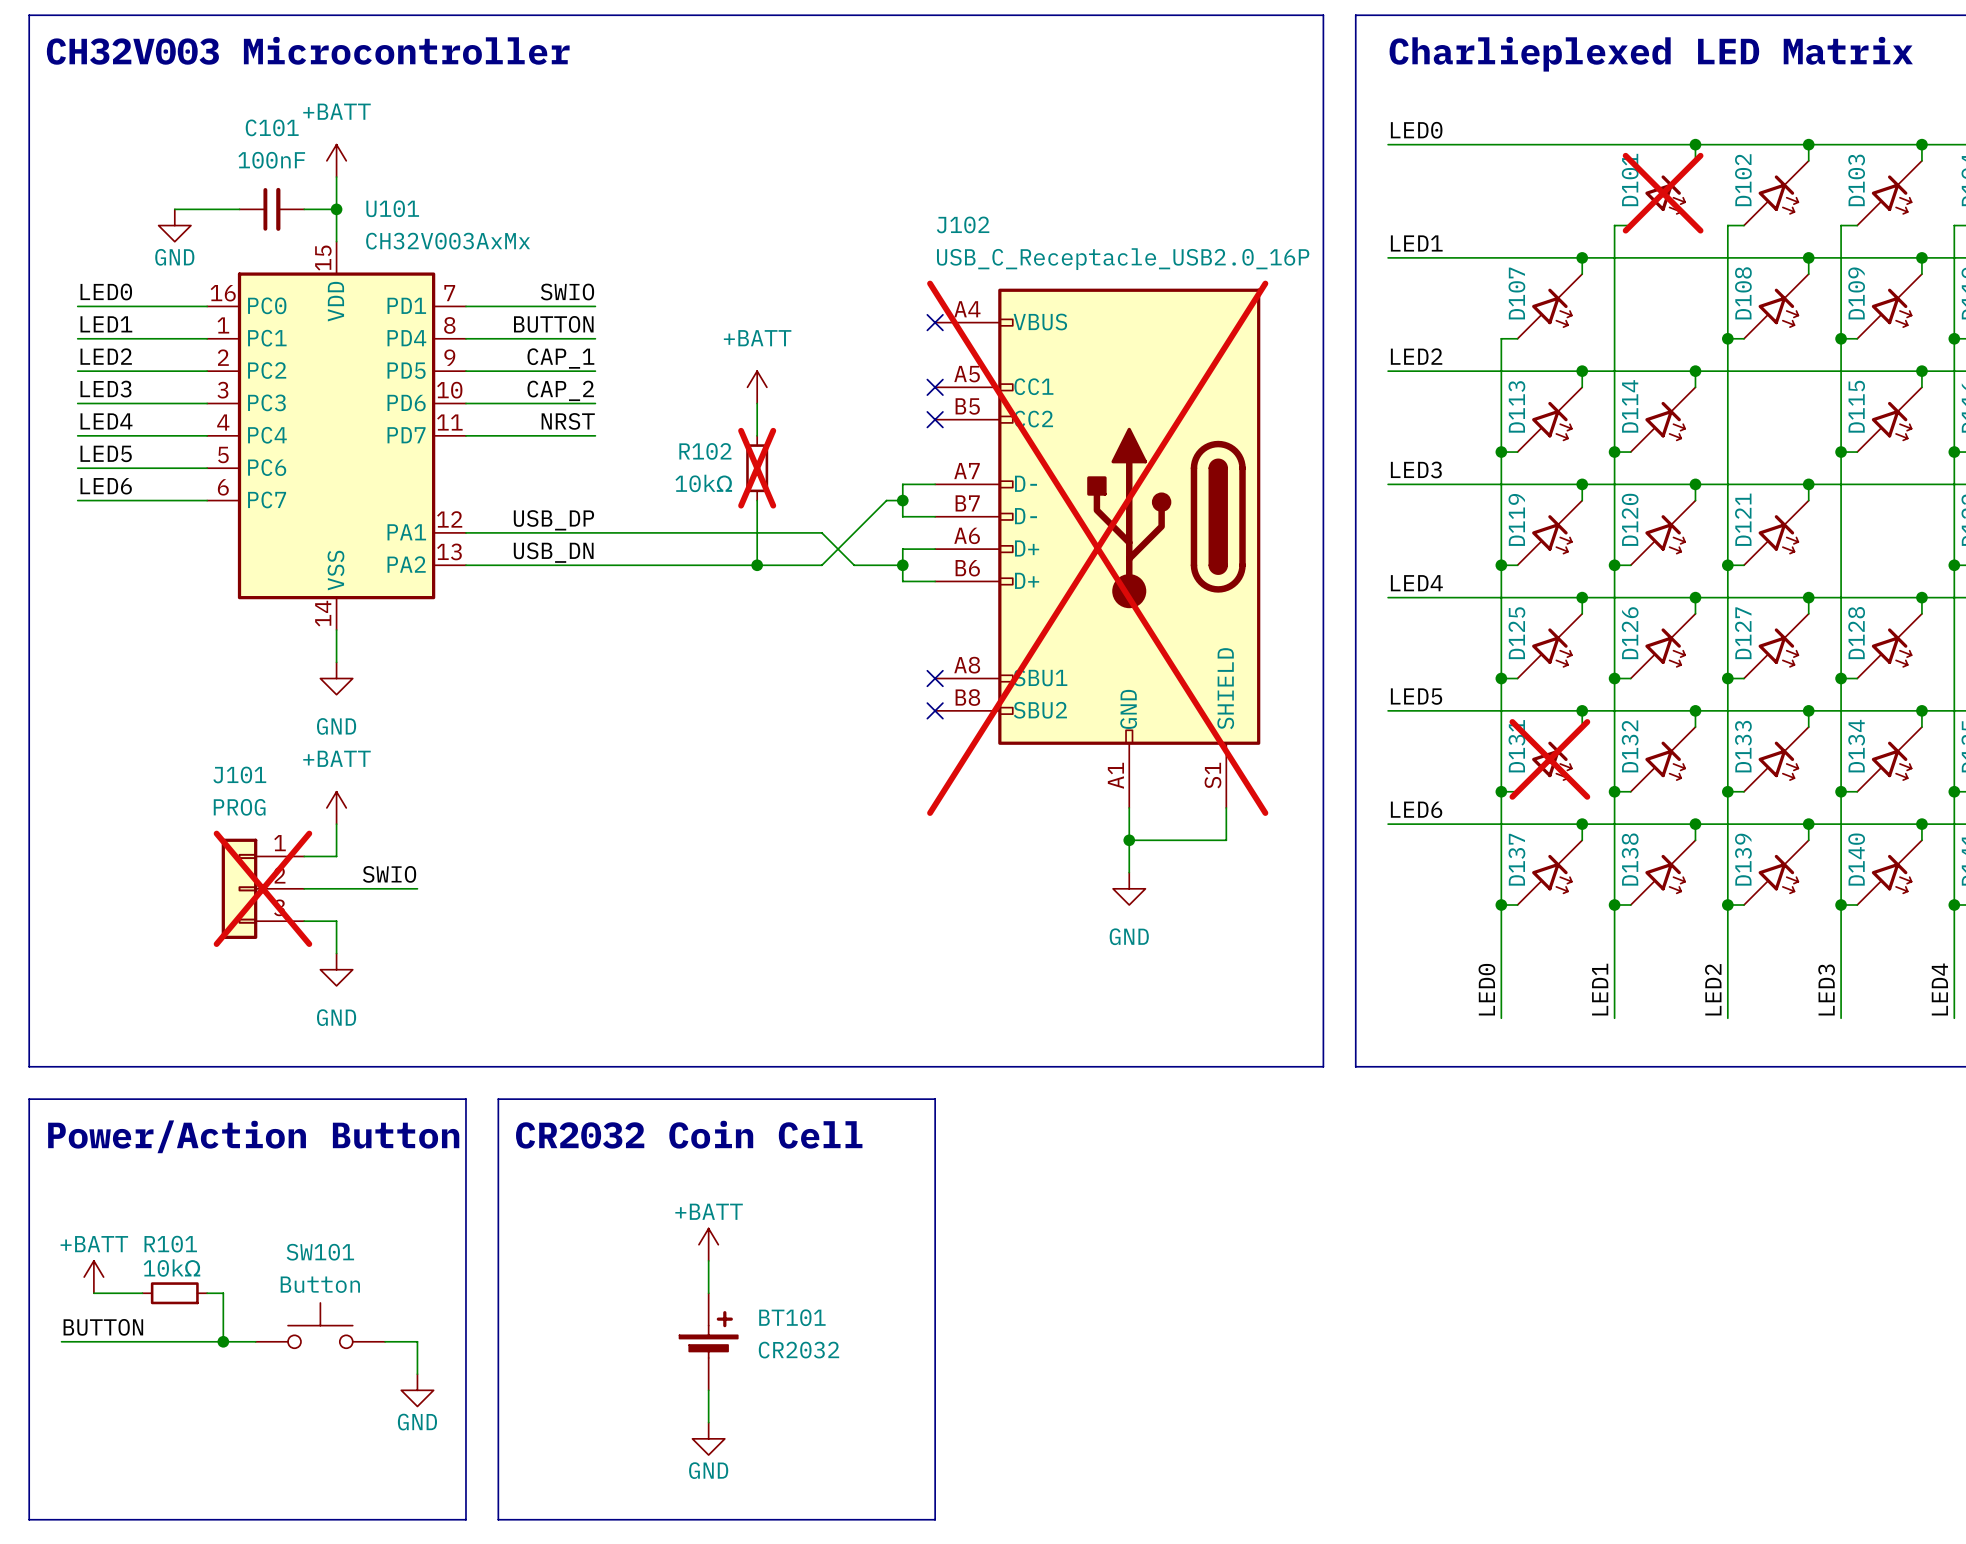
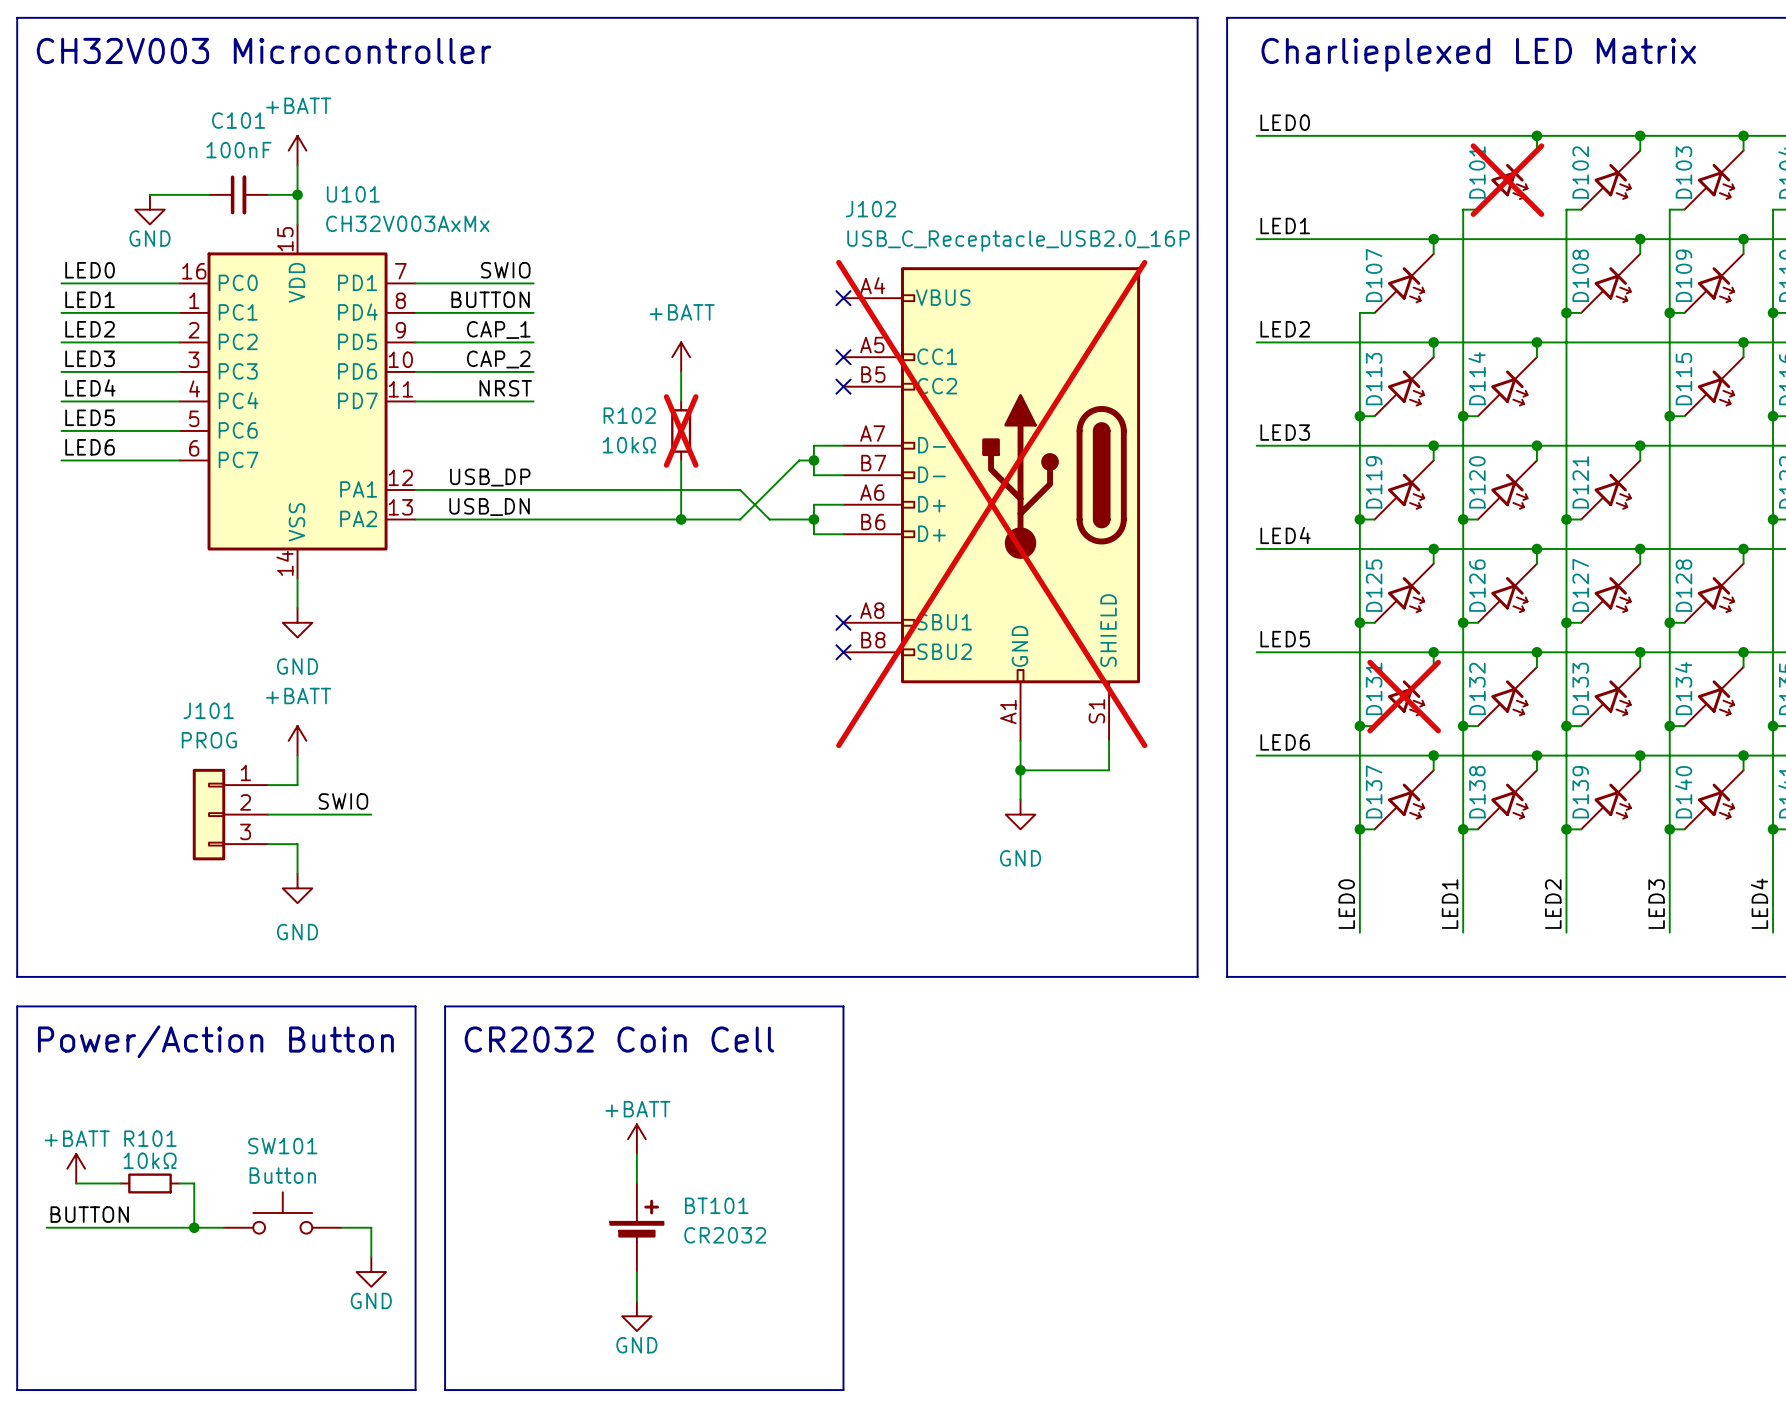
J101 do-not-place cross: (262, 888) -> none

